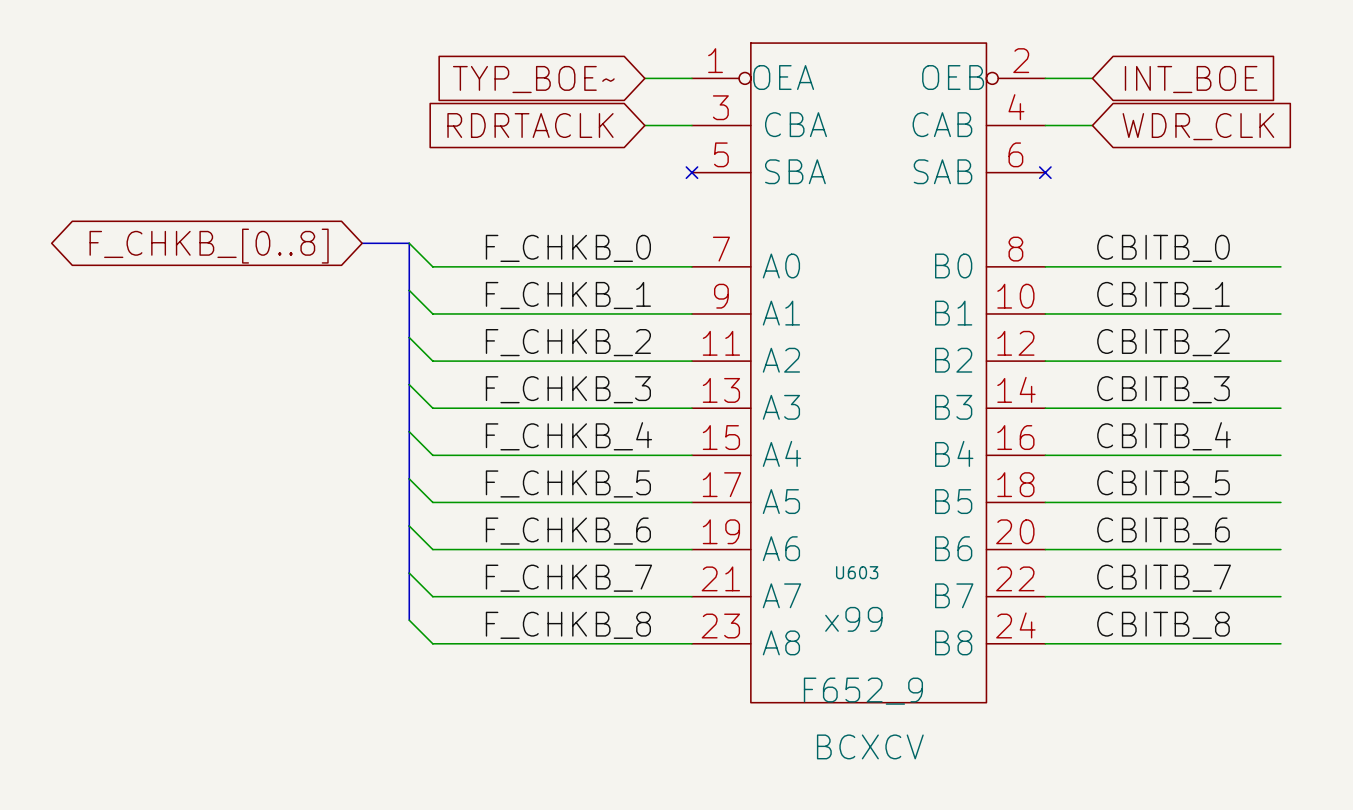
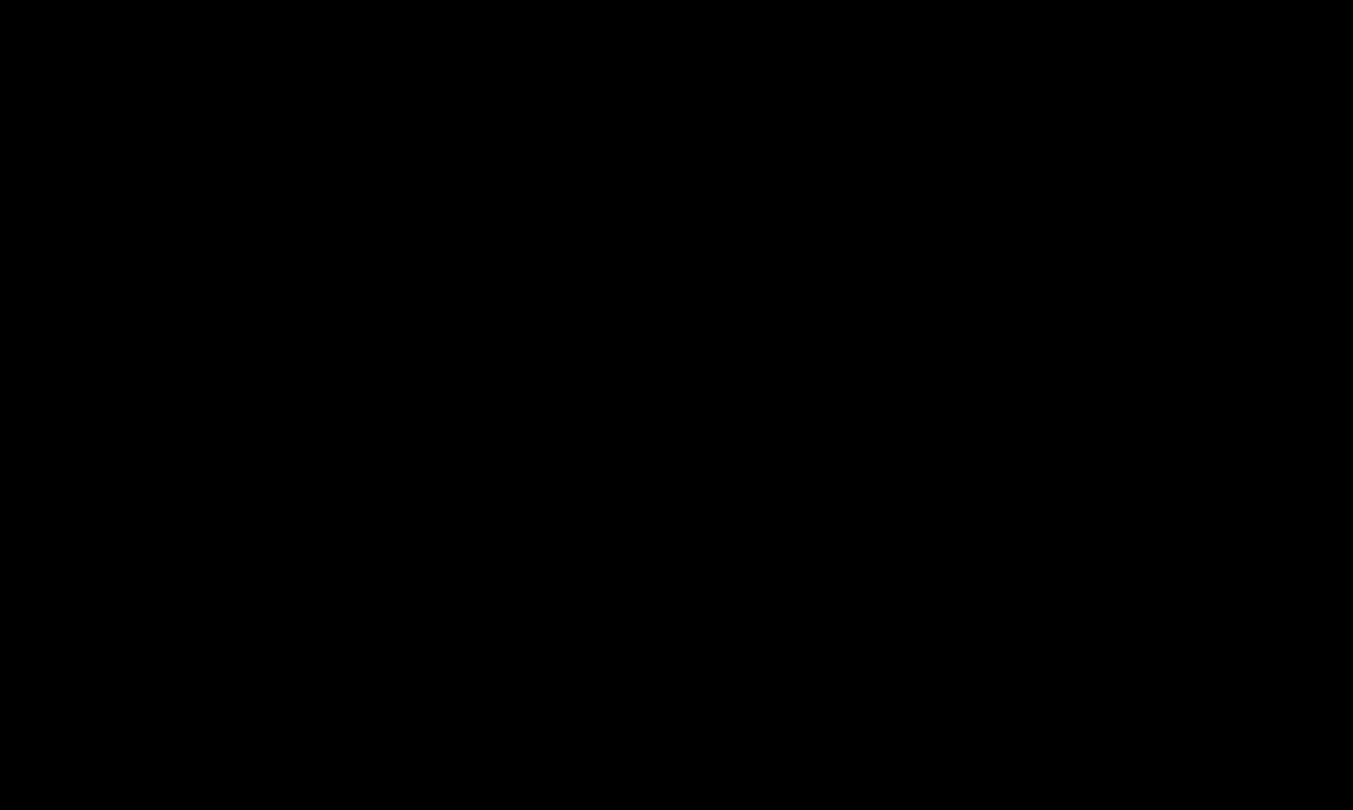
wire: (644, 78) (691, 78) -> none
wire: (1045, 78) (1092, 78) -> none
global label: TYP_BOE~ (533, 79) -> none
global label: INT_BOE (1191, 79) -> none
global label: RDRTACLK (530, 125) -> none
wire: (644, 125) (691, 125) -> none
wire: (1045, 125) (1092, 125) -> none
global label: WDR_CLK (1198, 126) -> none
no-connect mark: (691, 172) -> none
no-connect mark: (1045, 172) -> none
bus: (362, 243) (409, 243) (409, 620) -> none
wire: (409, 243) (432, 266) (691, 266) -> none
global label: F_CHKB_[0..8] (209, 246) -> none
label: F_CHKB_0 (568, 248) -> none
label: CBITB_0 (1163, 248) -> none
wire: (1045, 266) (1280, 266) -> none
wire: (409, 290) (432, 313) (691, 313) -> none
label: F_CHKB_1 (568, 295) -> none
label: CBITB_1 (1163, 295) -> none
wire: (1045, 313) (1280, 313) -> none
wire: (409, 337) (432, 361) (691, 361) -> none
label: F_CHKB_2 (568, 342) -> none
label: CBITB_2 (1163, 342) -> none
wire: (1045, 361) (1280, 361) -> none
U603: F652_9 (868, 372) -> none
wire: (409, 384) (432, 408) (691, 408) -> none
label: F_CHKB_3 (568, 389) -> none
label: CBITB_3 (1163, 389) -> none
wire: (1045, 408) (1280, 408) -> none
wire: (409, 431) (432, 455) (691, 455) -> none
label: F_CHKB_4 (568, 436) -> none
label: CBITB_4 (1164, 436) -> none
wire: (1045, 455) (1280, 455) -> none
wire: (409, 478) (432, 502) (691, 502) -> none
label: F_CHKB_5 (568, 483) -> none
label: CBITB_5 (1163, 483) -> none
wire: (1045, 502) (1280, 502) -> none
wire: (409, 526) (432, 549) (691, 549) -> none
label: F_CHKB_6 (568, 531) -> none
label: CBITB_6 (1163, 531) -> none
wire: (1045, 549) (1280, 549) -> none
wire: (409, 573) (432, 596) (691, 596) -> none
label: F_CHKB_7 (568, 578) -> none
label: CBITB_7 (1164, 578) -> none
wire: (1045, 596) (1280, 596) -> none
wire: (409, 620) (432, 643) (691, 643) -> none
label: F_CHKB_8 (568, 625) -> none
label: CBITB_8 (1163, 625) -> none
wire: (1045, 643) (1280, 643) -> none

